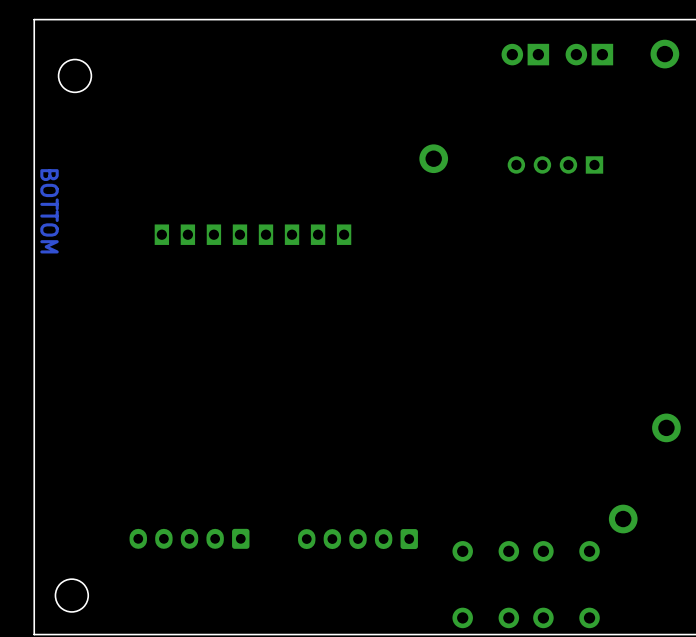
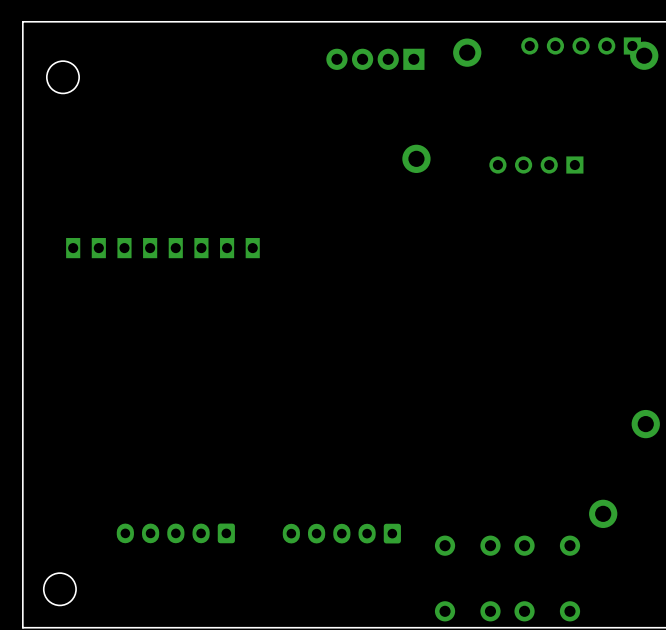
part: none -> (581, 45)
part: none -> (467, 52)
part: (525, 54) -> none
part: (589, 54) -> none
part: none -> (375, 59)
text: BOTTOM (49, 211) -> none
part position: (252, 234) -> (162, 248)

